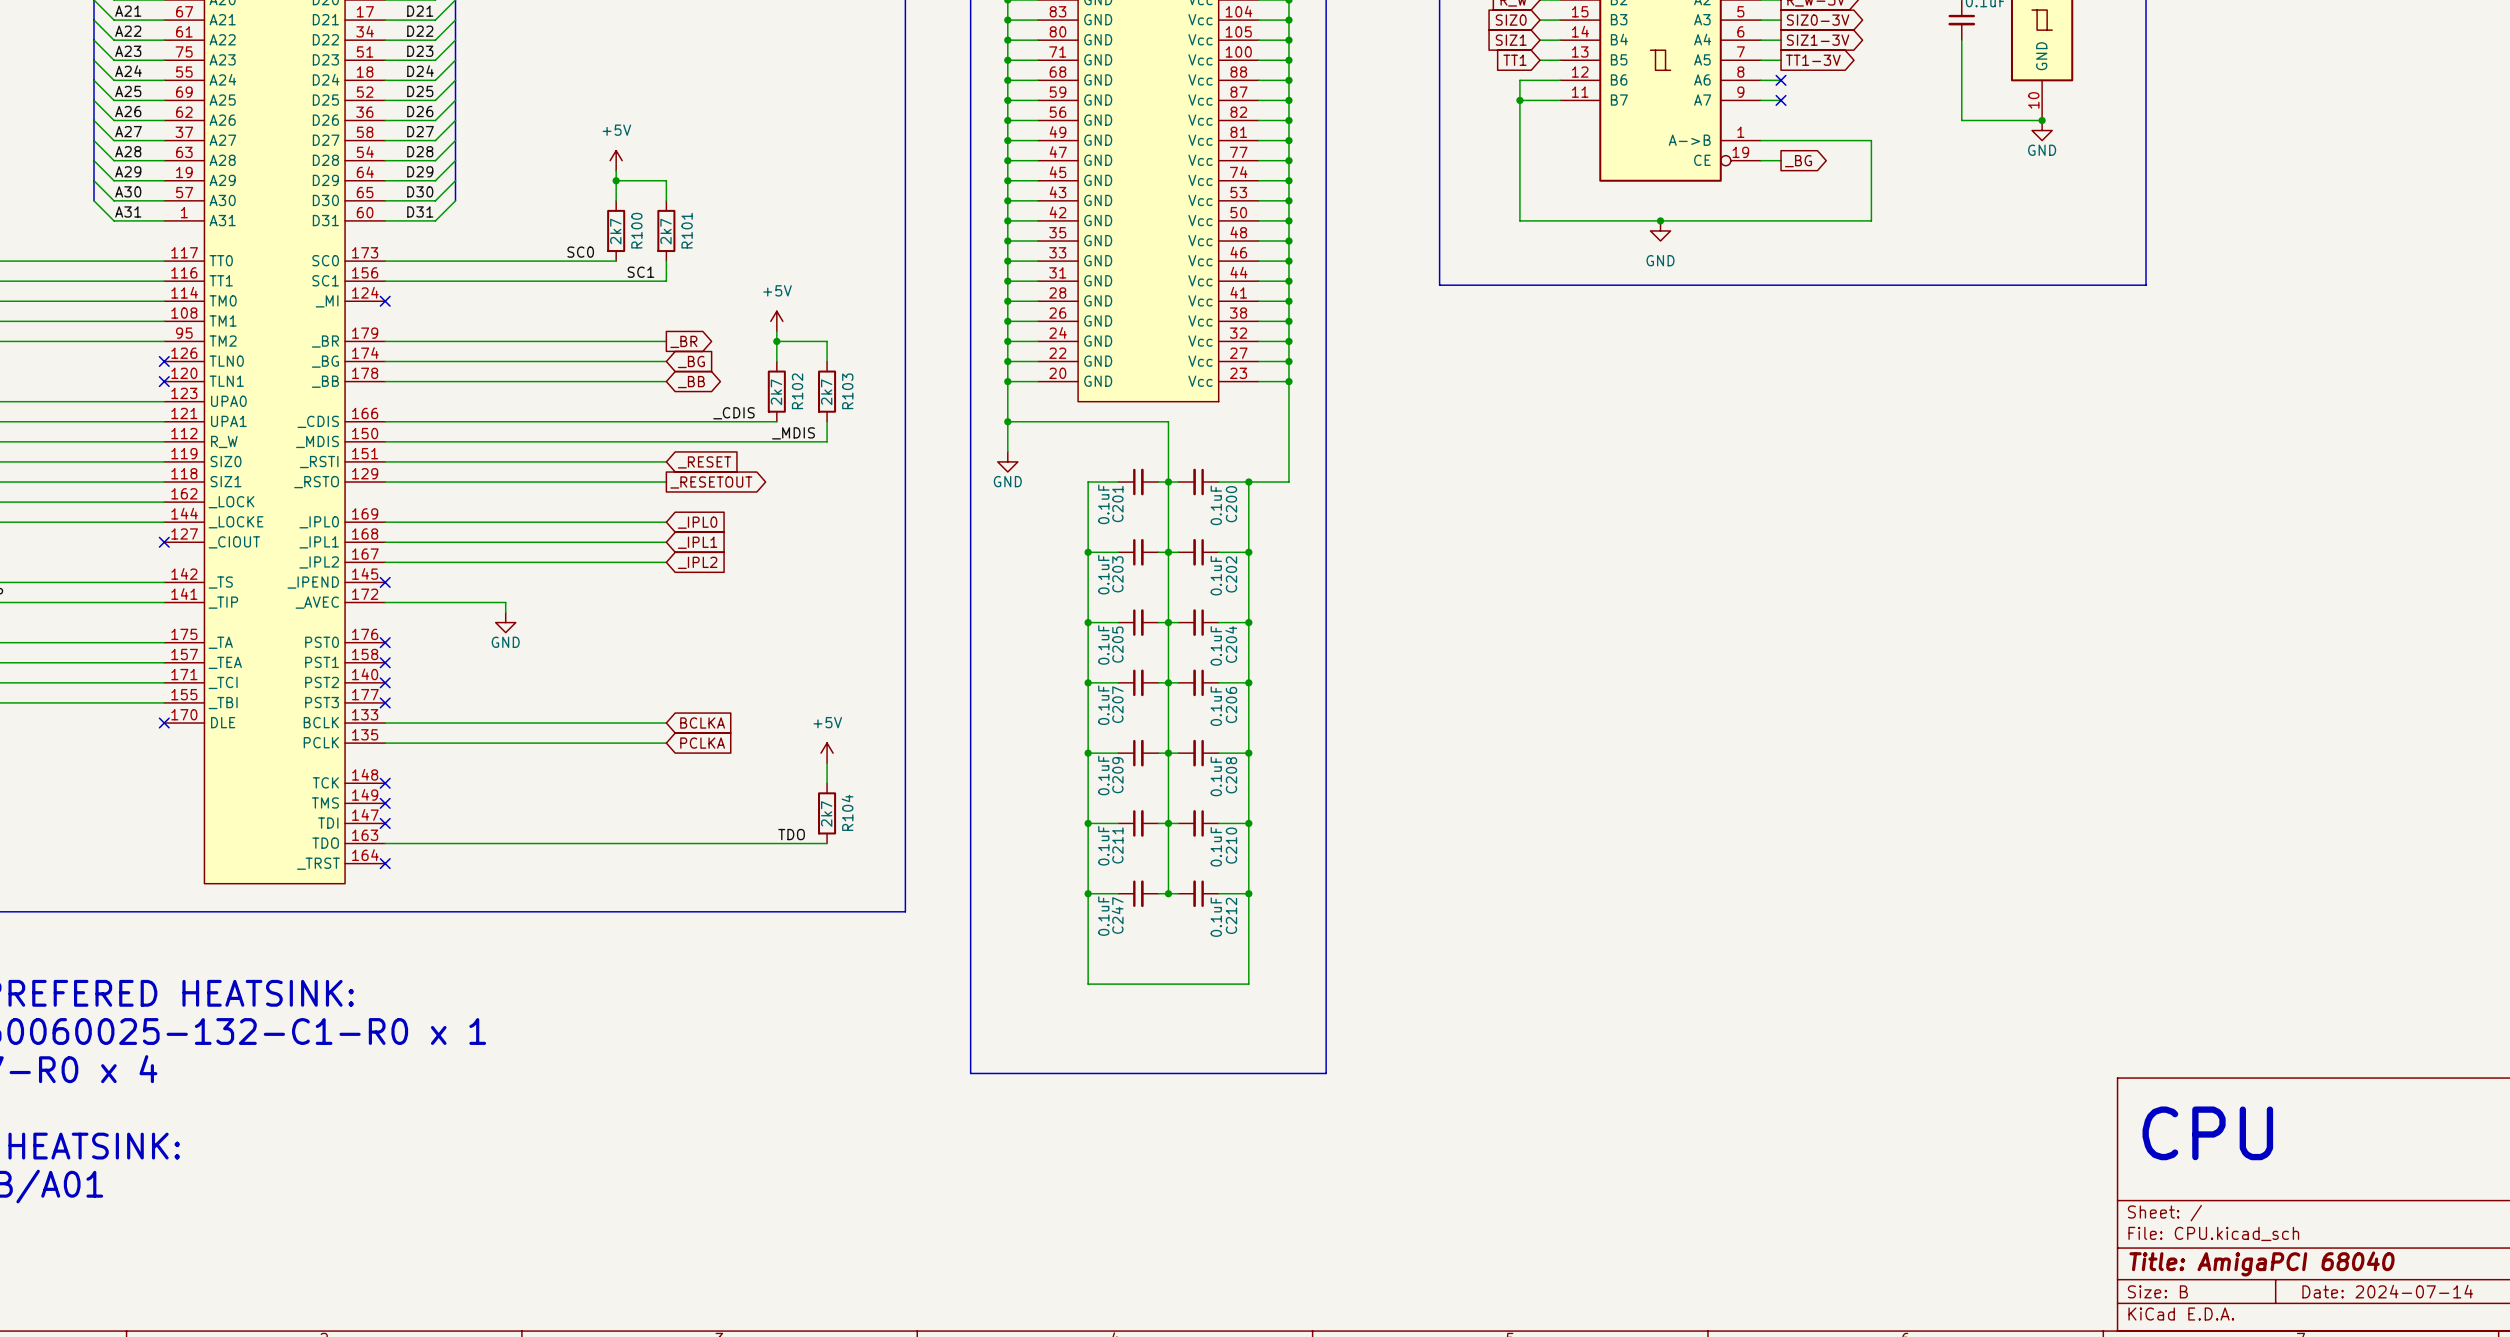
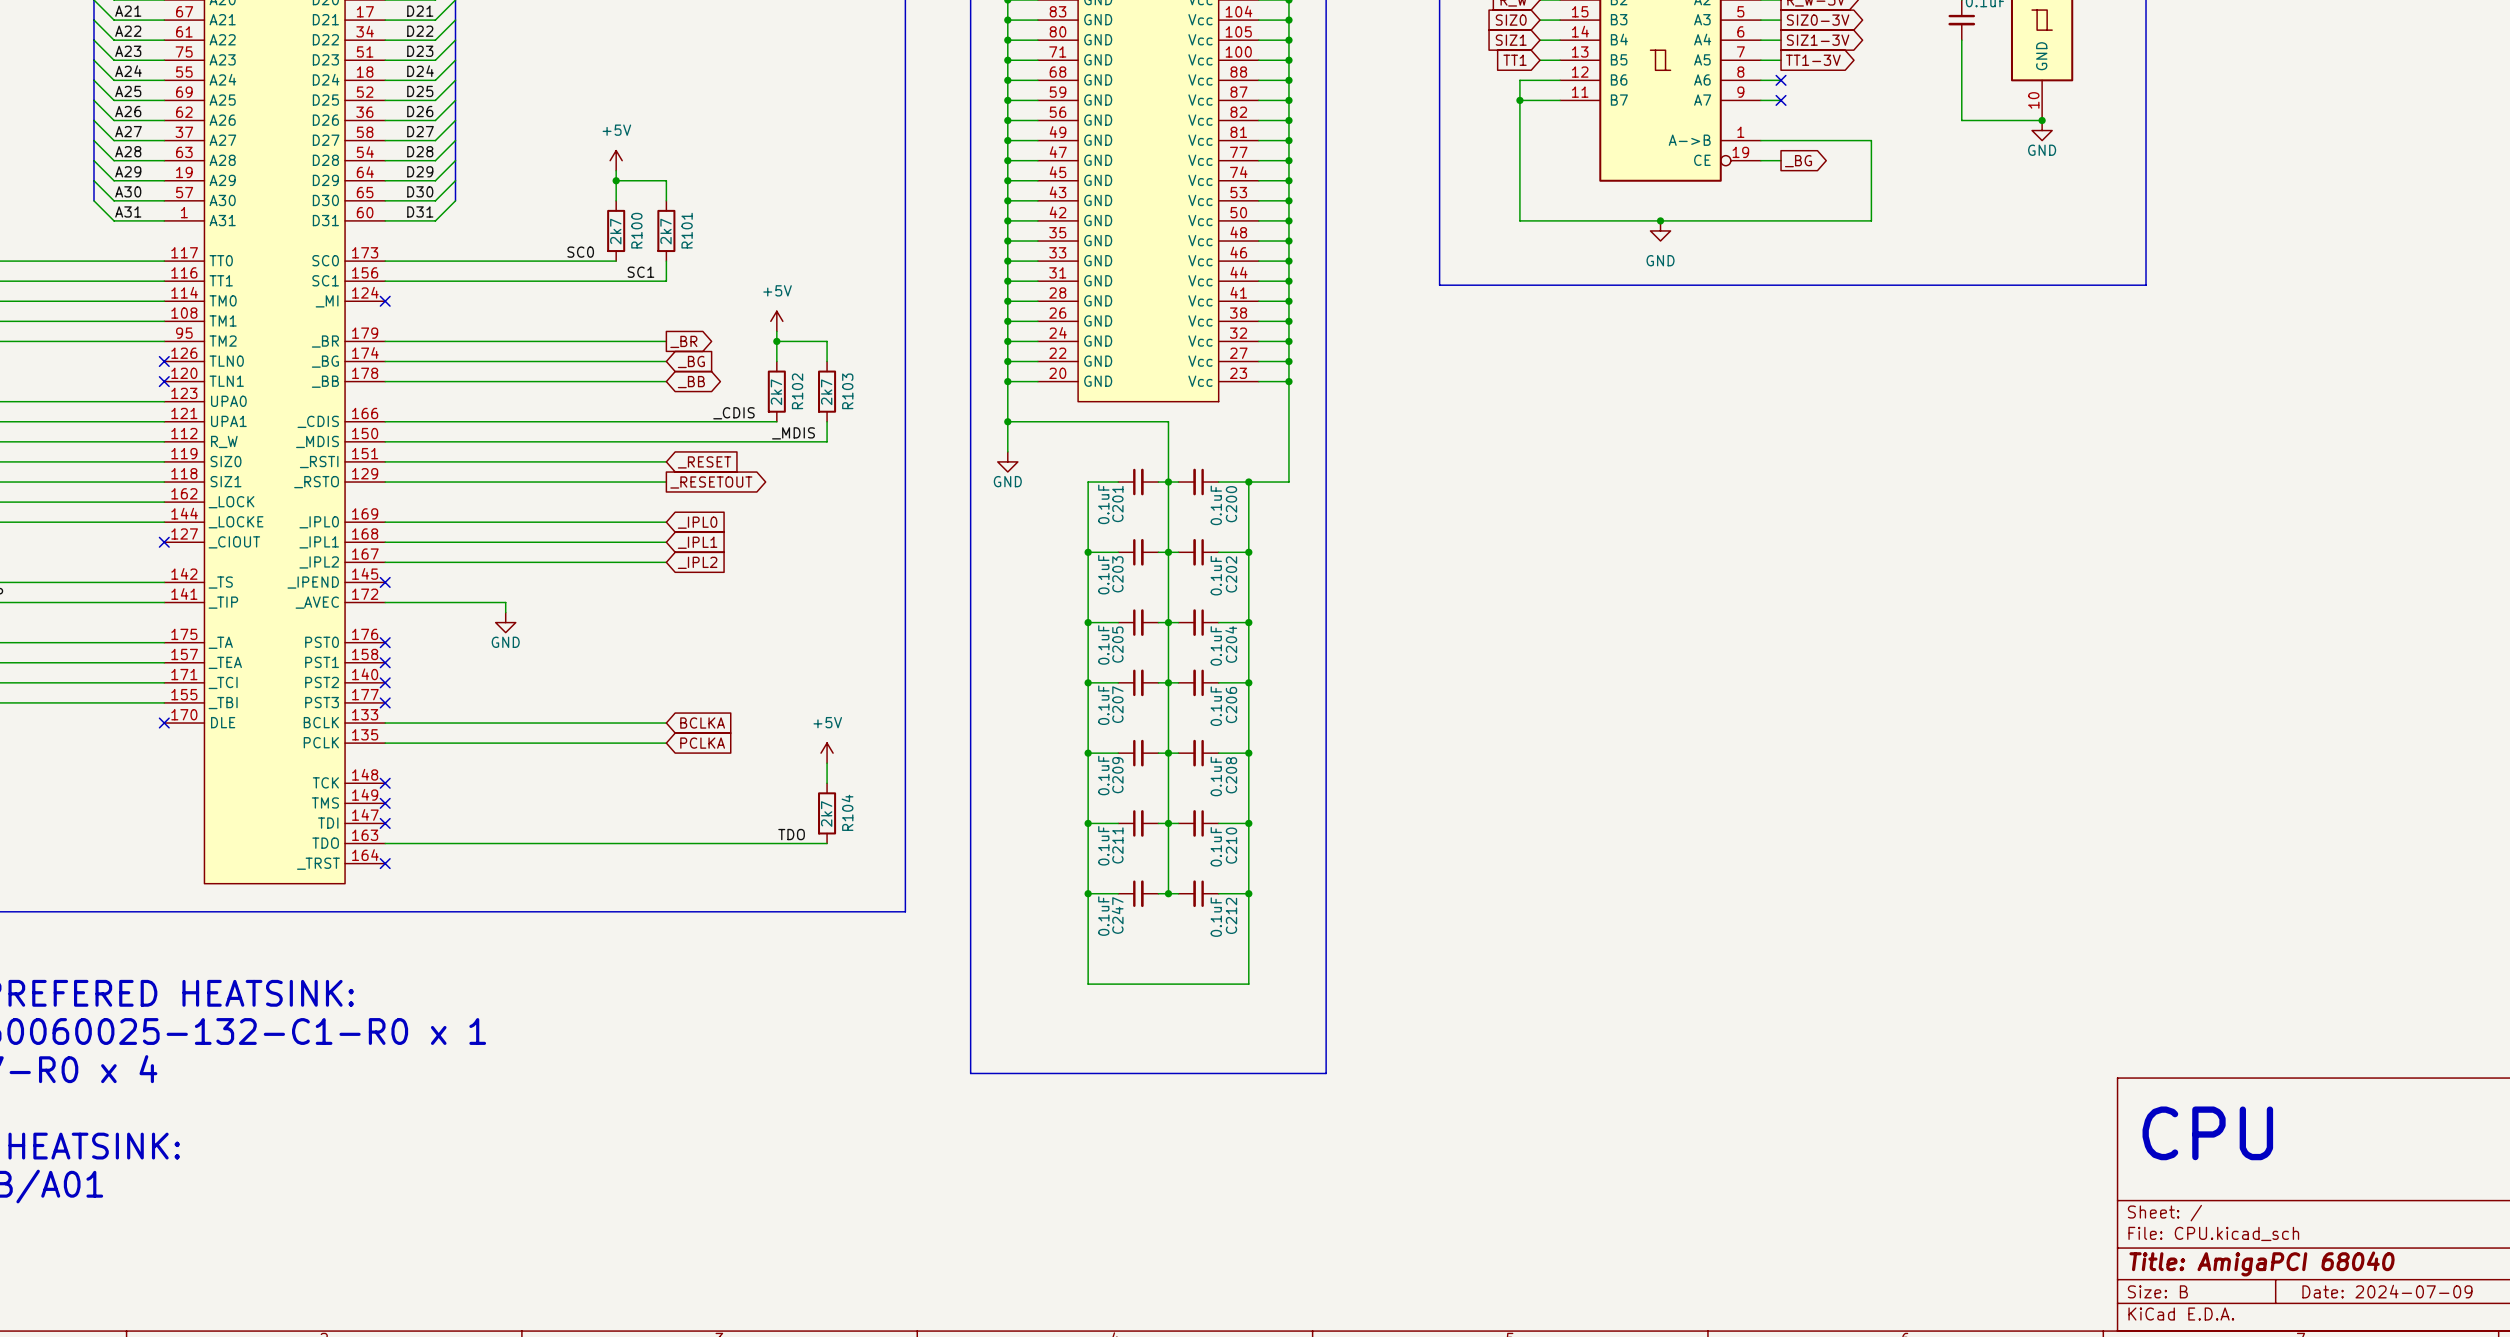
title block: Date: 2024-07-14 (2387, 1291) -> Date: 2024-07-09 (2387, 1291)

